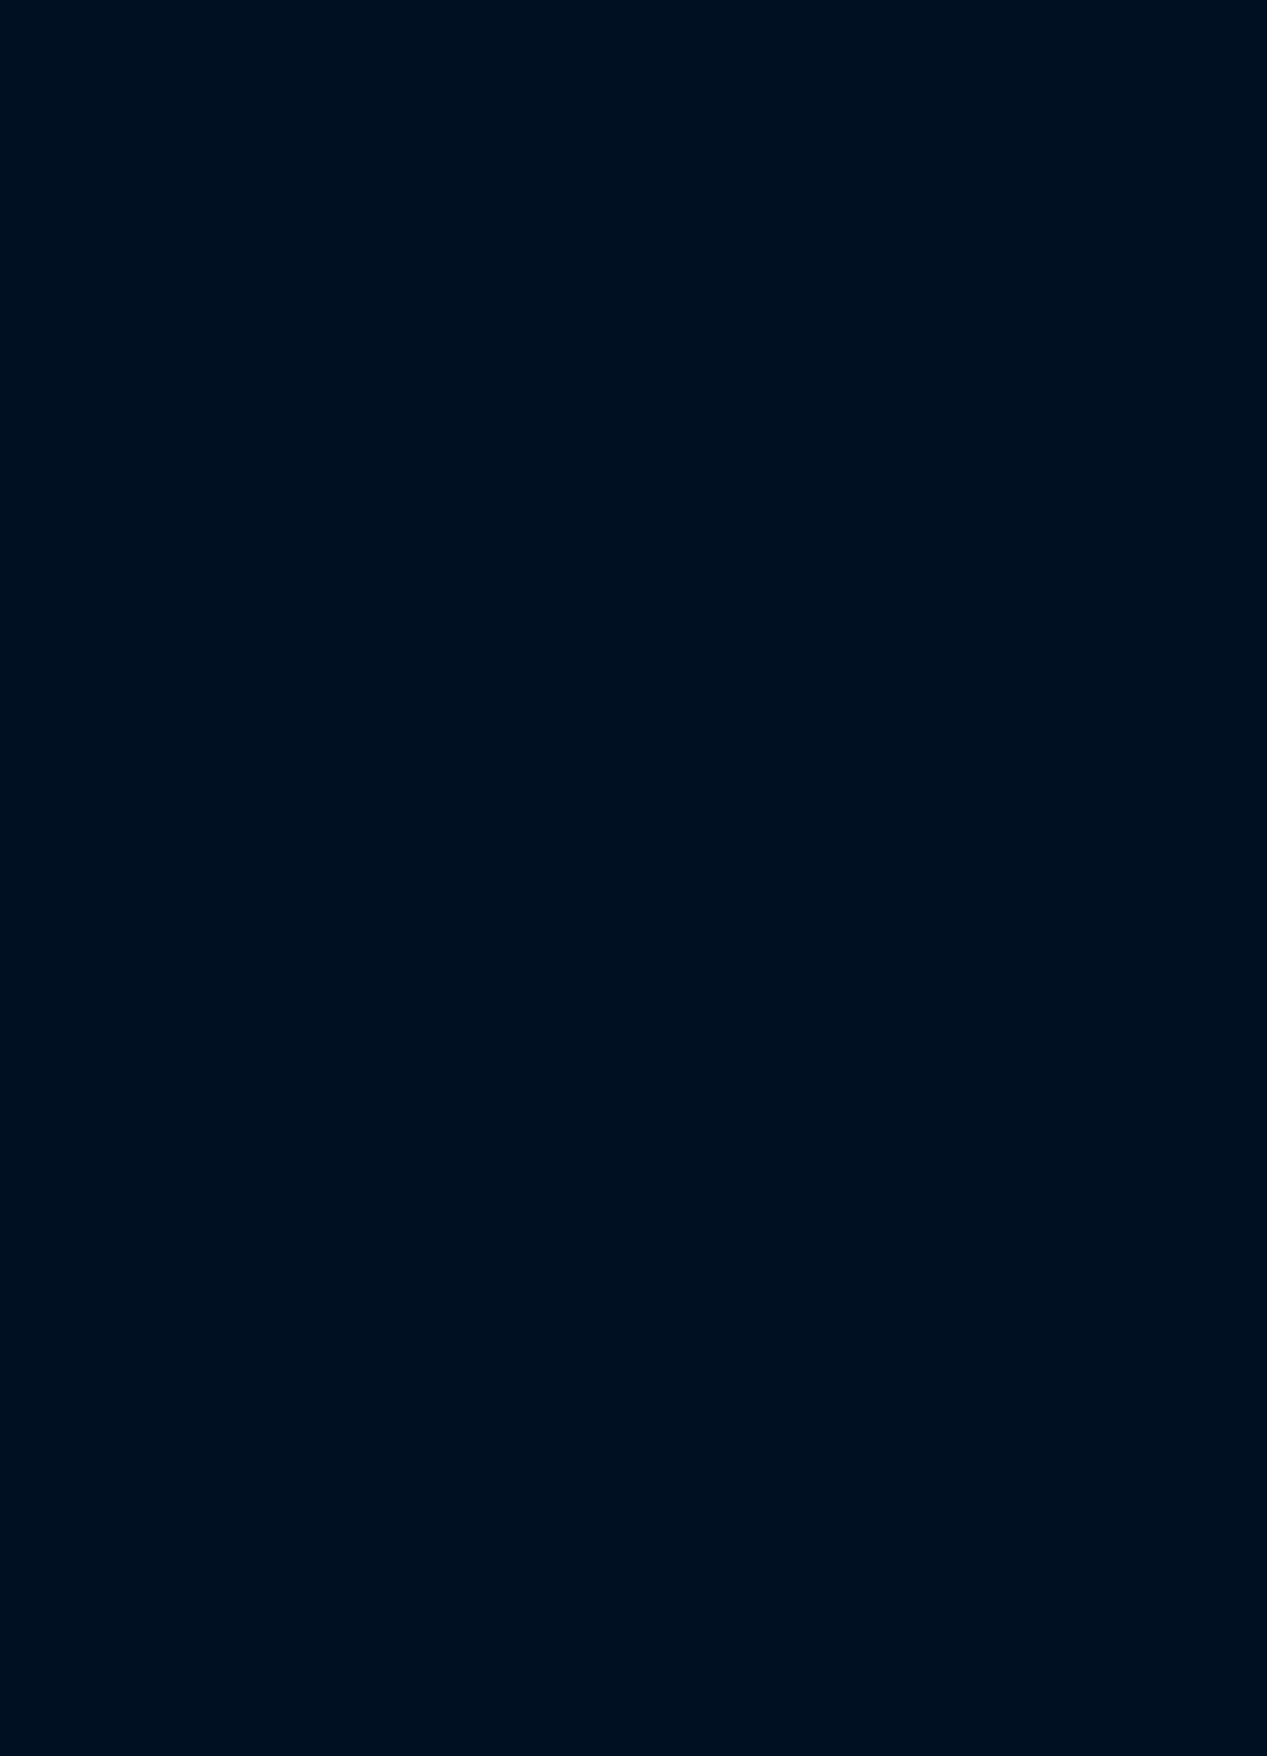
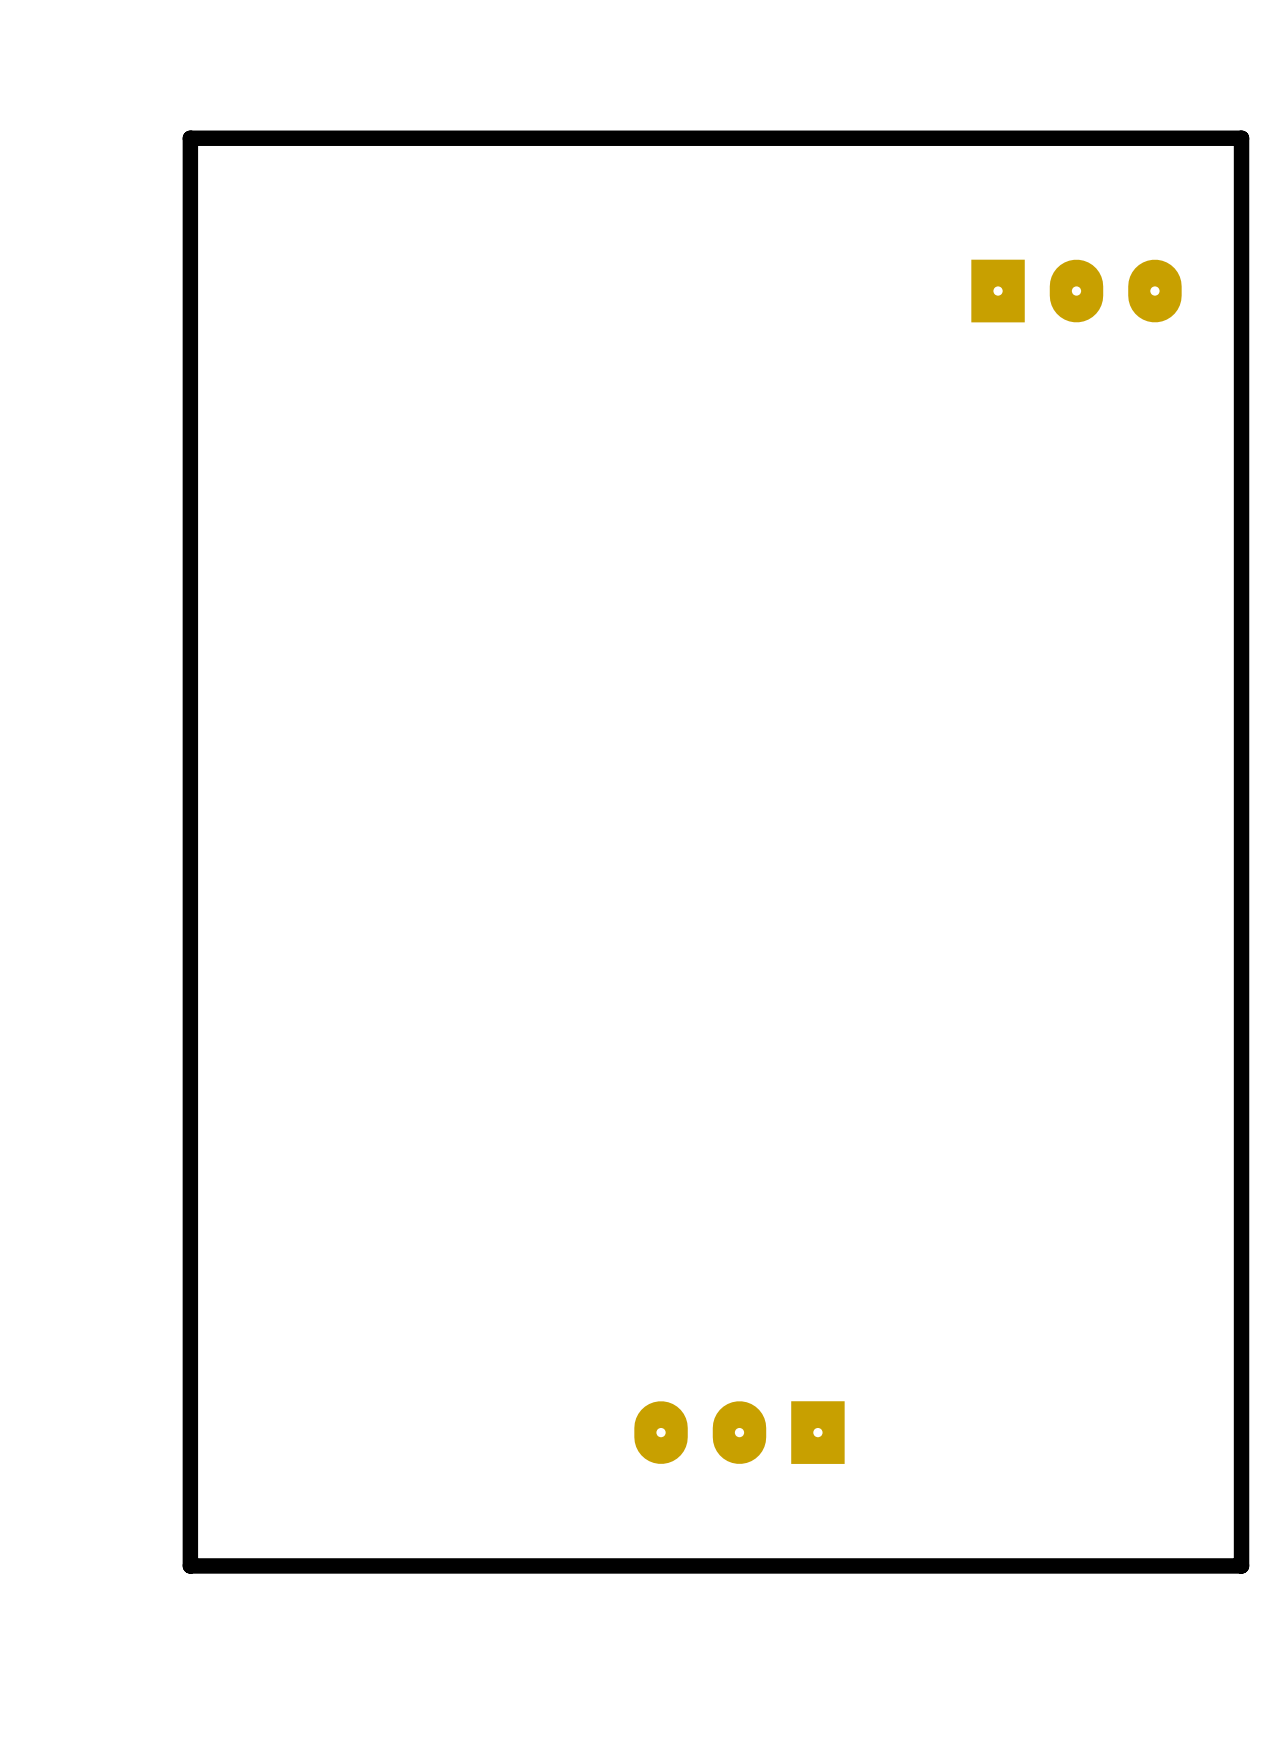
board edge: none -> (1241, 138) (190, 138) (190, 1565) (1241, 1565) (1241, 138)
part: none -> (1076, 291)
part: none -> (739, 1432)

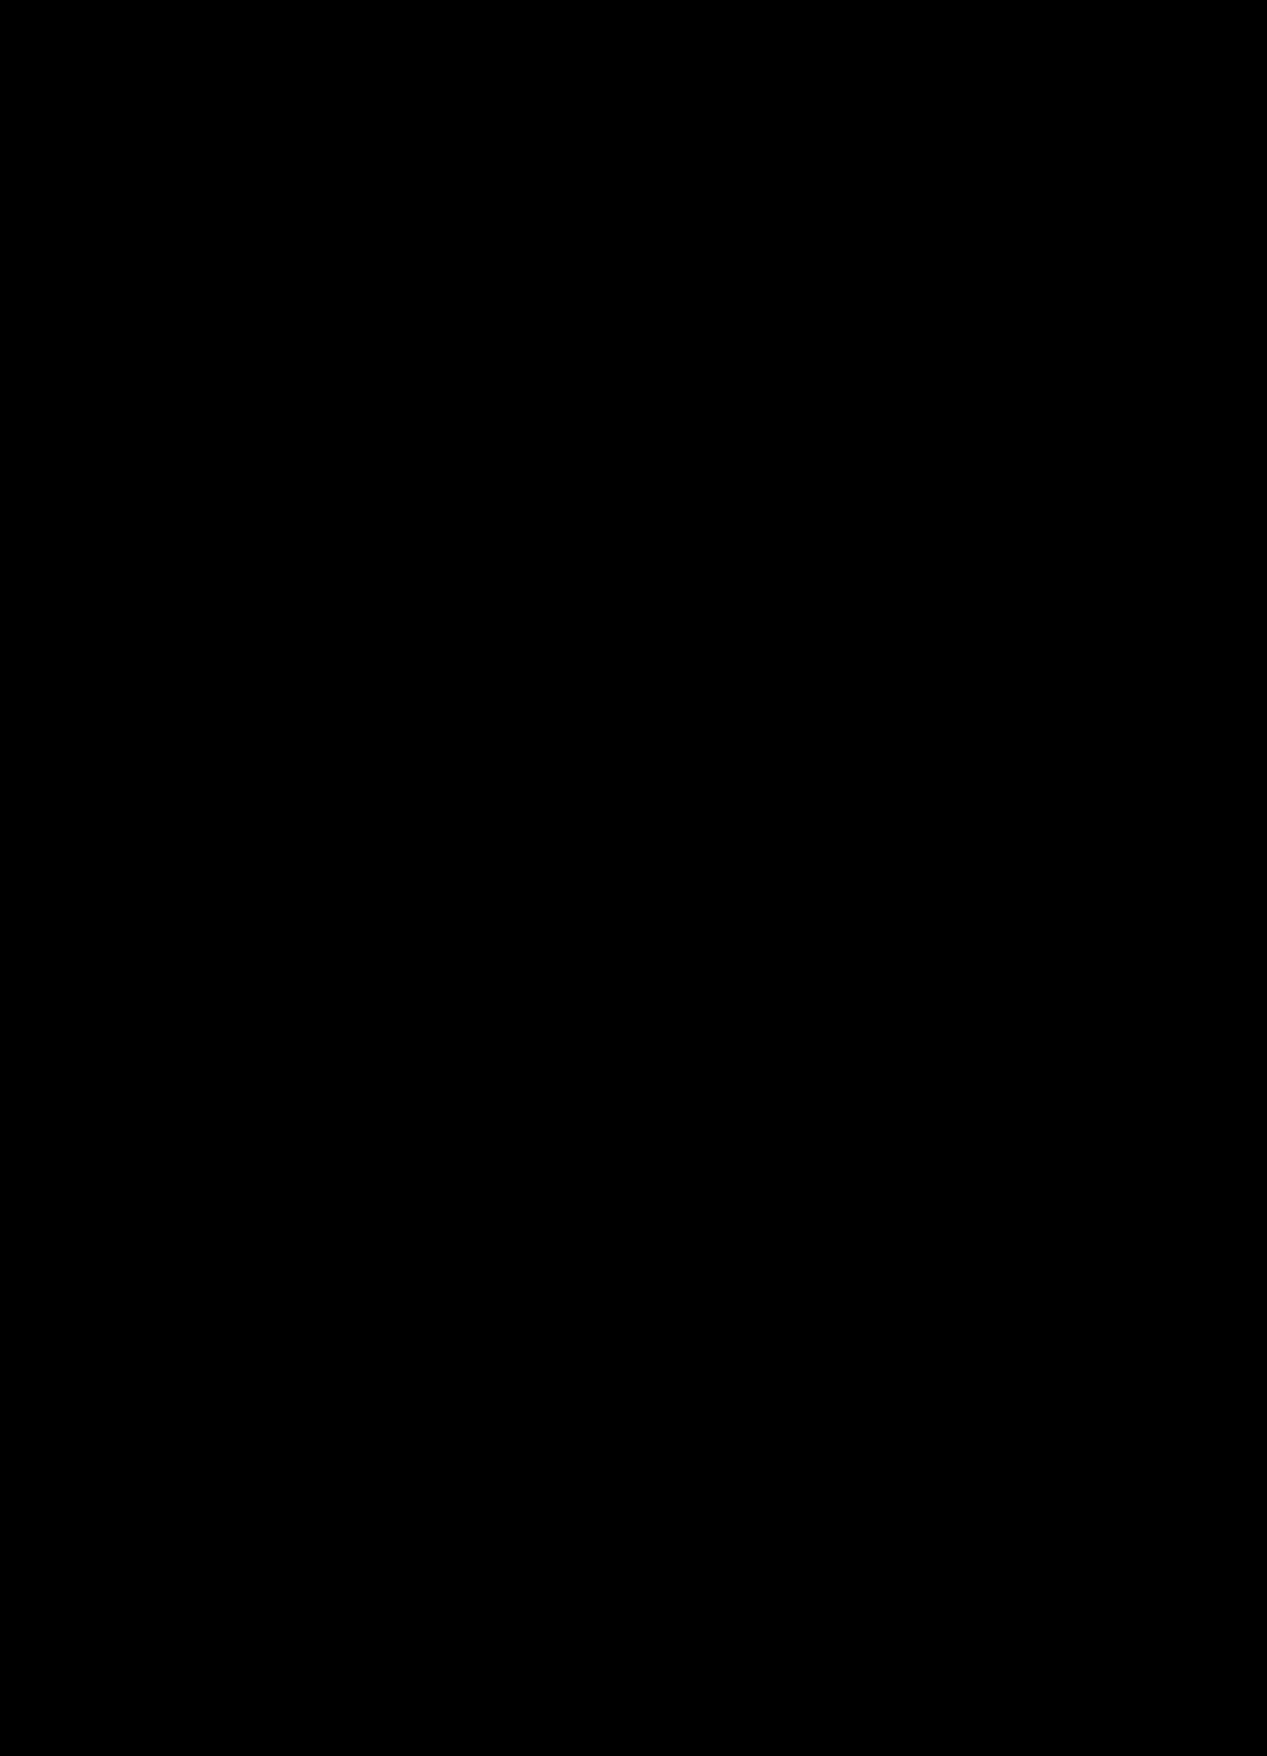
board edge: (1241, 138) (190, 138) (190, 1565) (1241, 1565) (1241, 138) -> none
part: (1076, 291) -> none
part: (739, 1432) -> none

